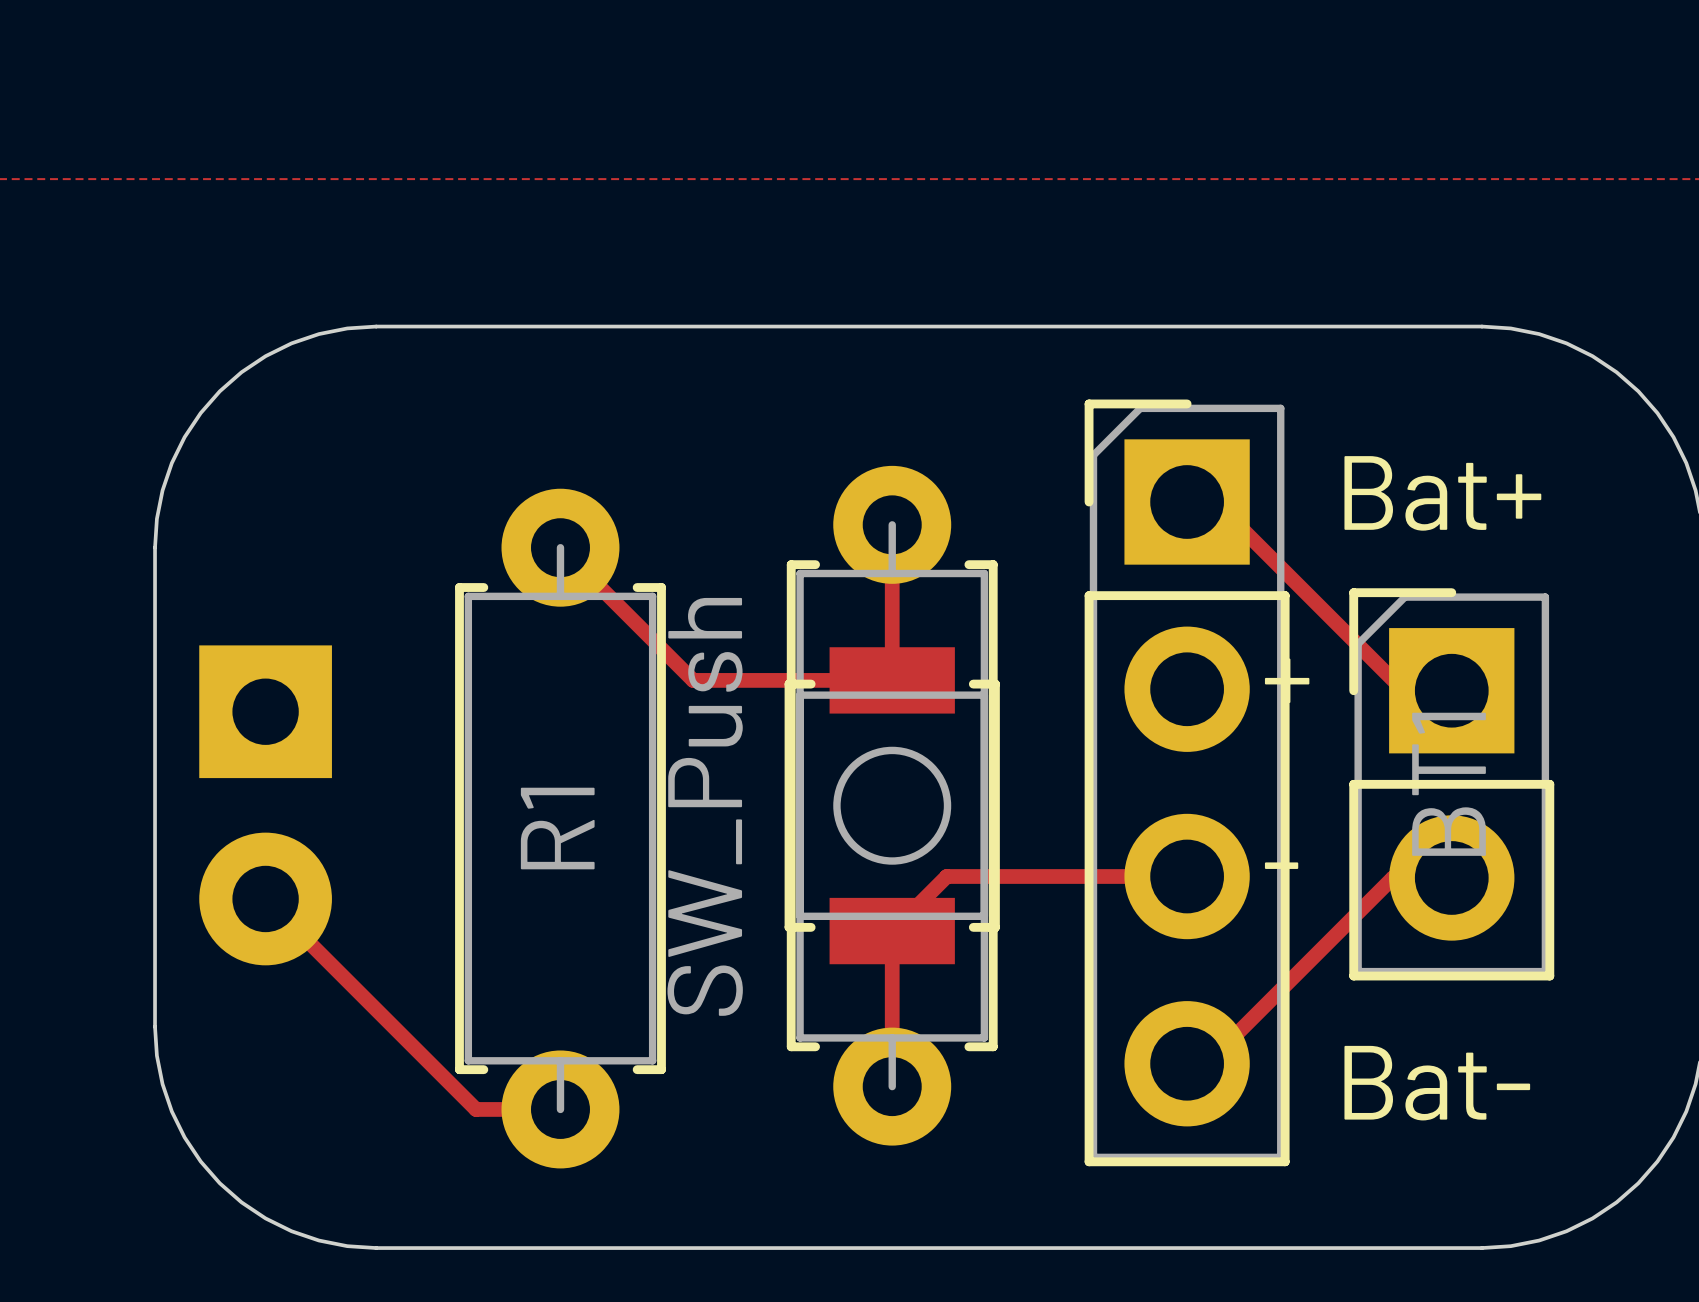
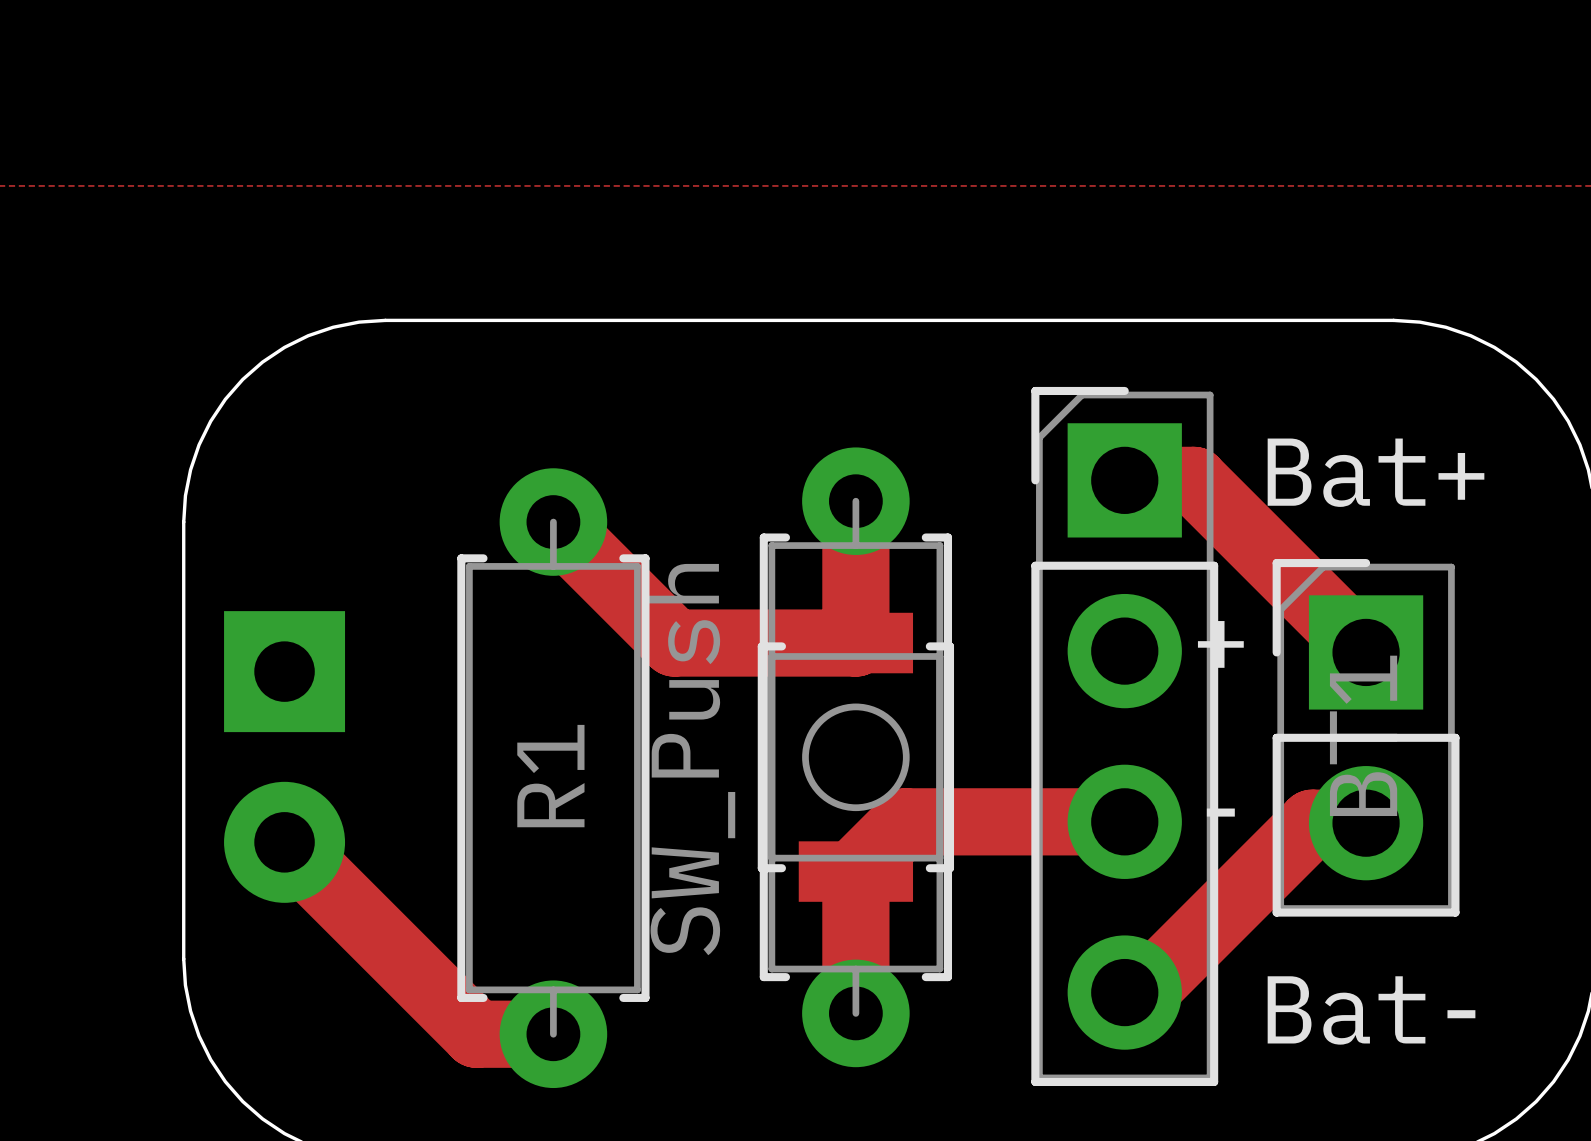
track: (1215, 502) (1445, 732) -> (1150, 480) (1193, 480) (1360, 646)
track width: thin (892, 524) (892, 680) (693, 680) (560, 547) -> thick (855, 501) (855, 643) (674, 643) (553, 522)
track width: thin (1187, 876) (946, 876) (892, 931) (892, 1086) -> thick (1124, 821) (905, 821) (855, 871) (855, 1013)
track width: thin (1451, 877) (1392, 877) (1207, 1063) (1187, 1063) -> thick (1366, 823) (1312, 823) (1142, 992) (1124, 992)
track width: thin (265, 898) (476, 1109) (560, 1109) -> thick (284, 842) (476, 1034) (553, 1034)

